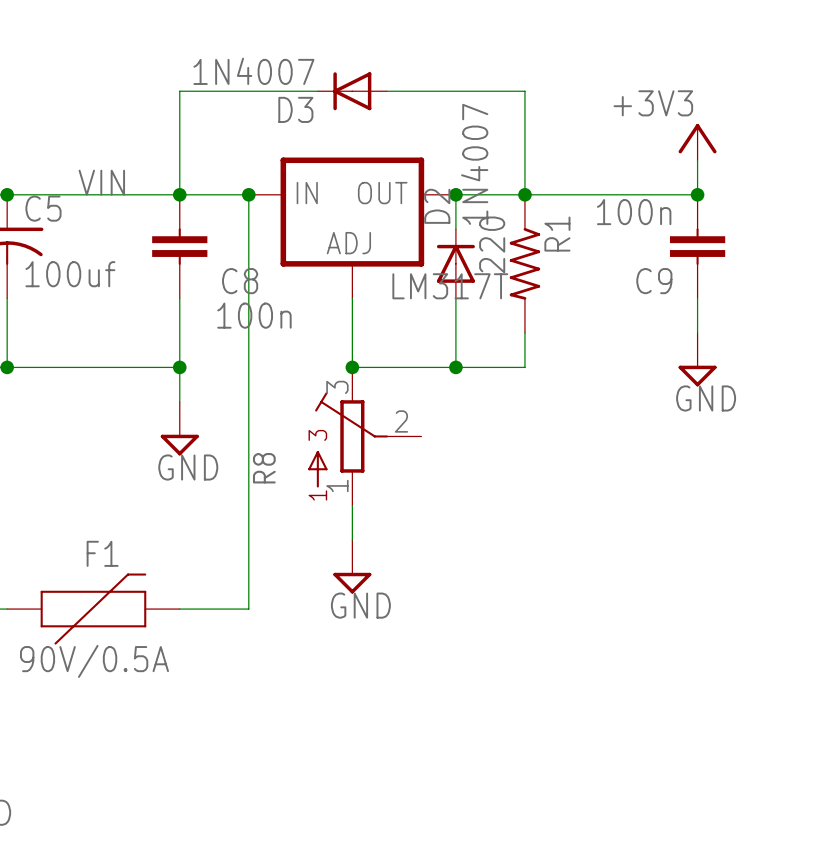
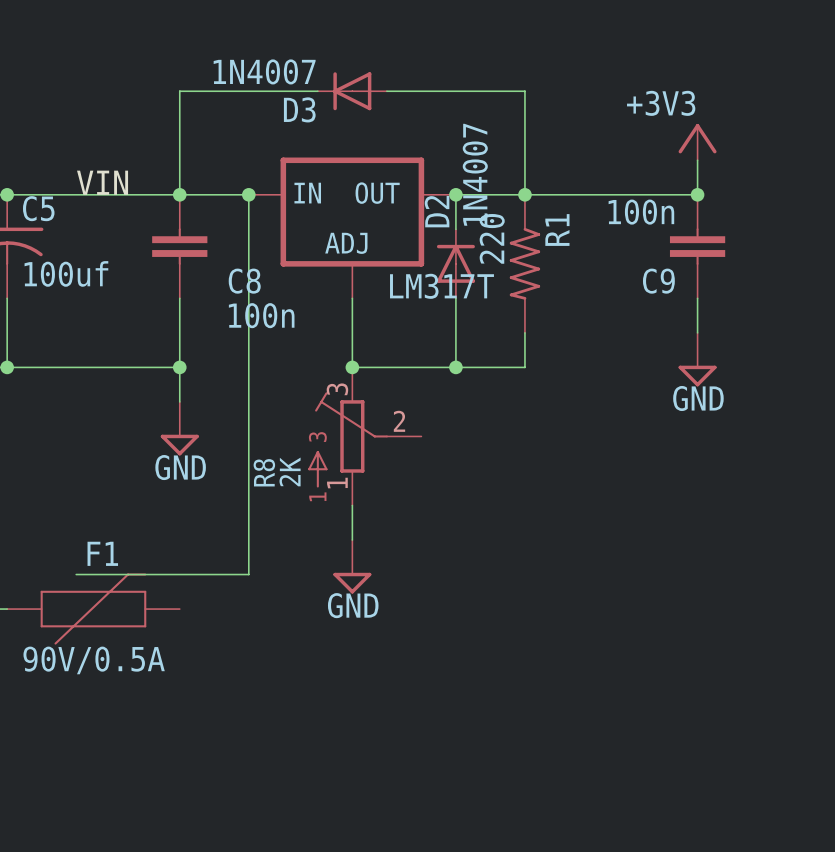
R8 value: none -> 2K (290, 471)
wire: (248, 574) (248, 609) (179, 609) -> (248, 574) (76, 574)

